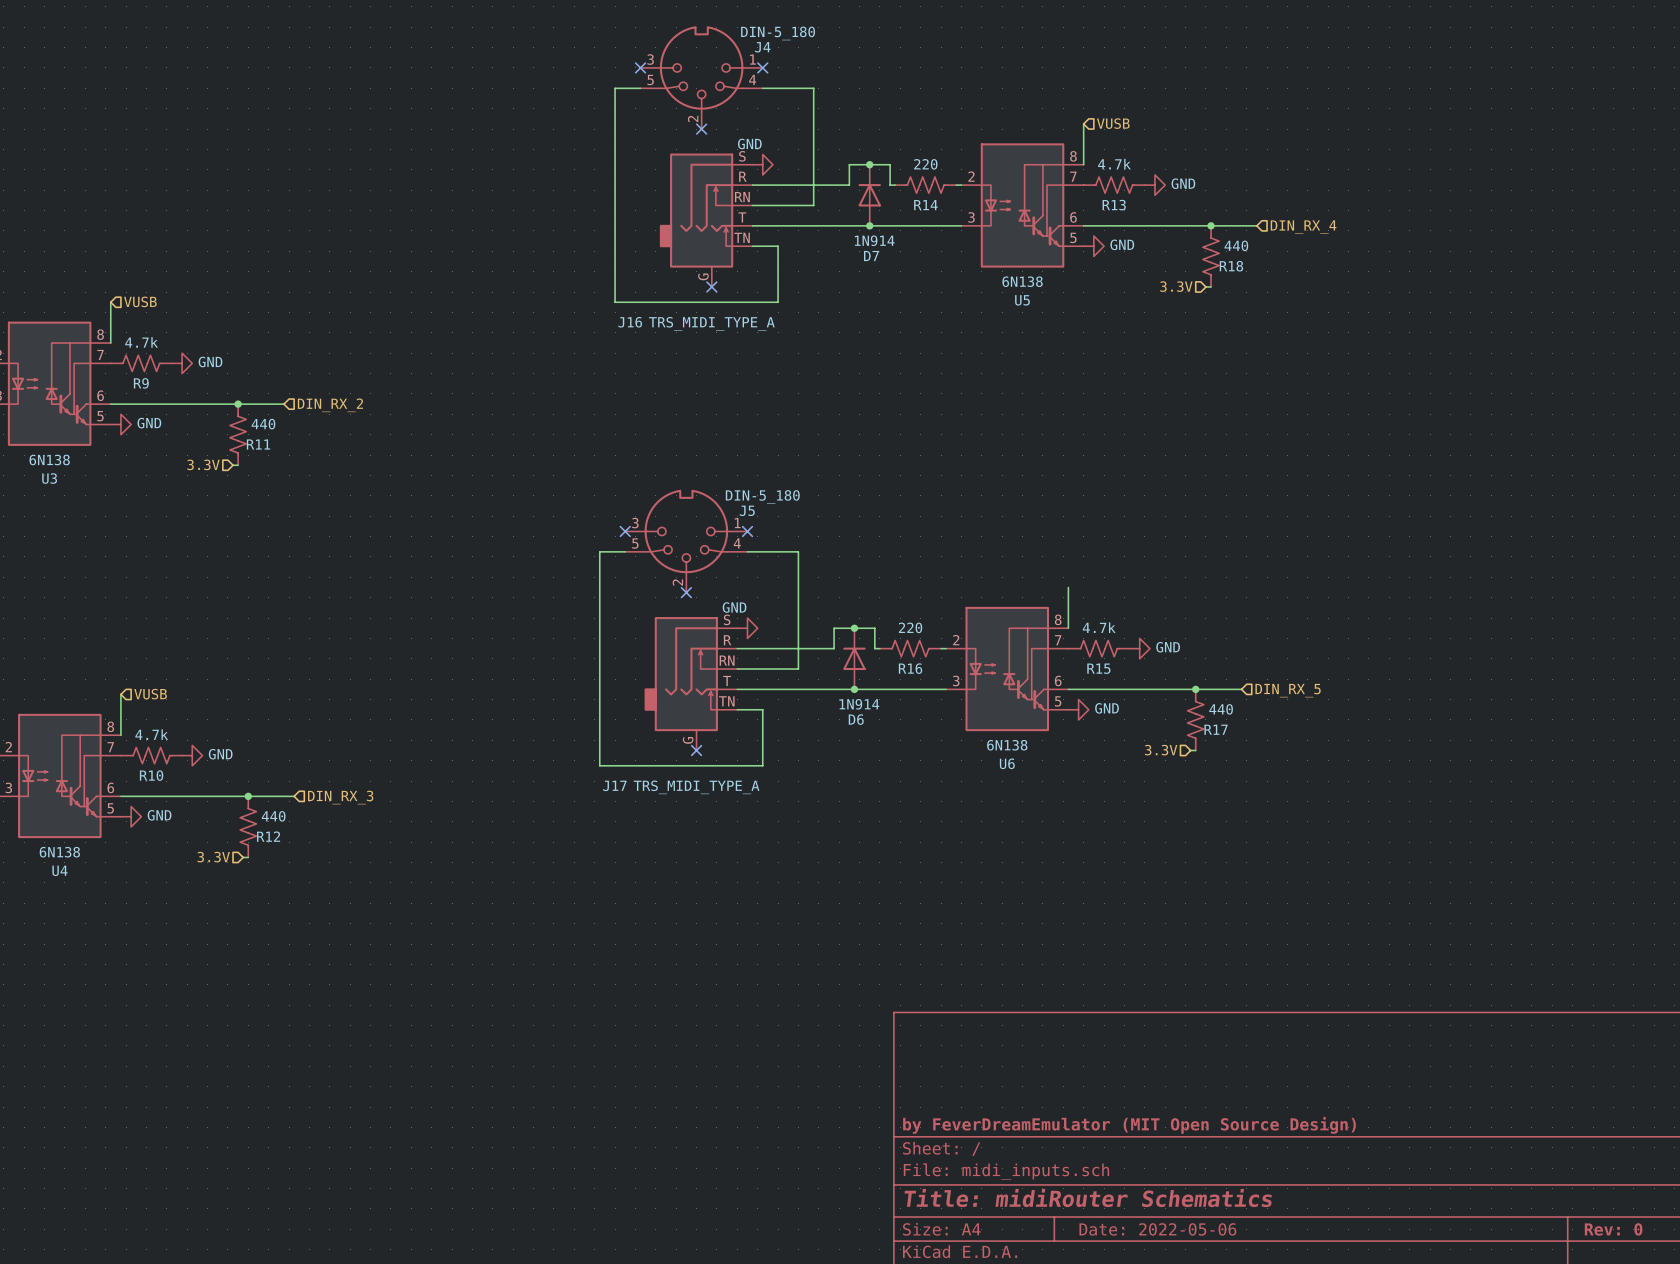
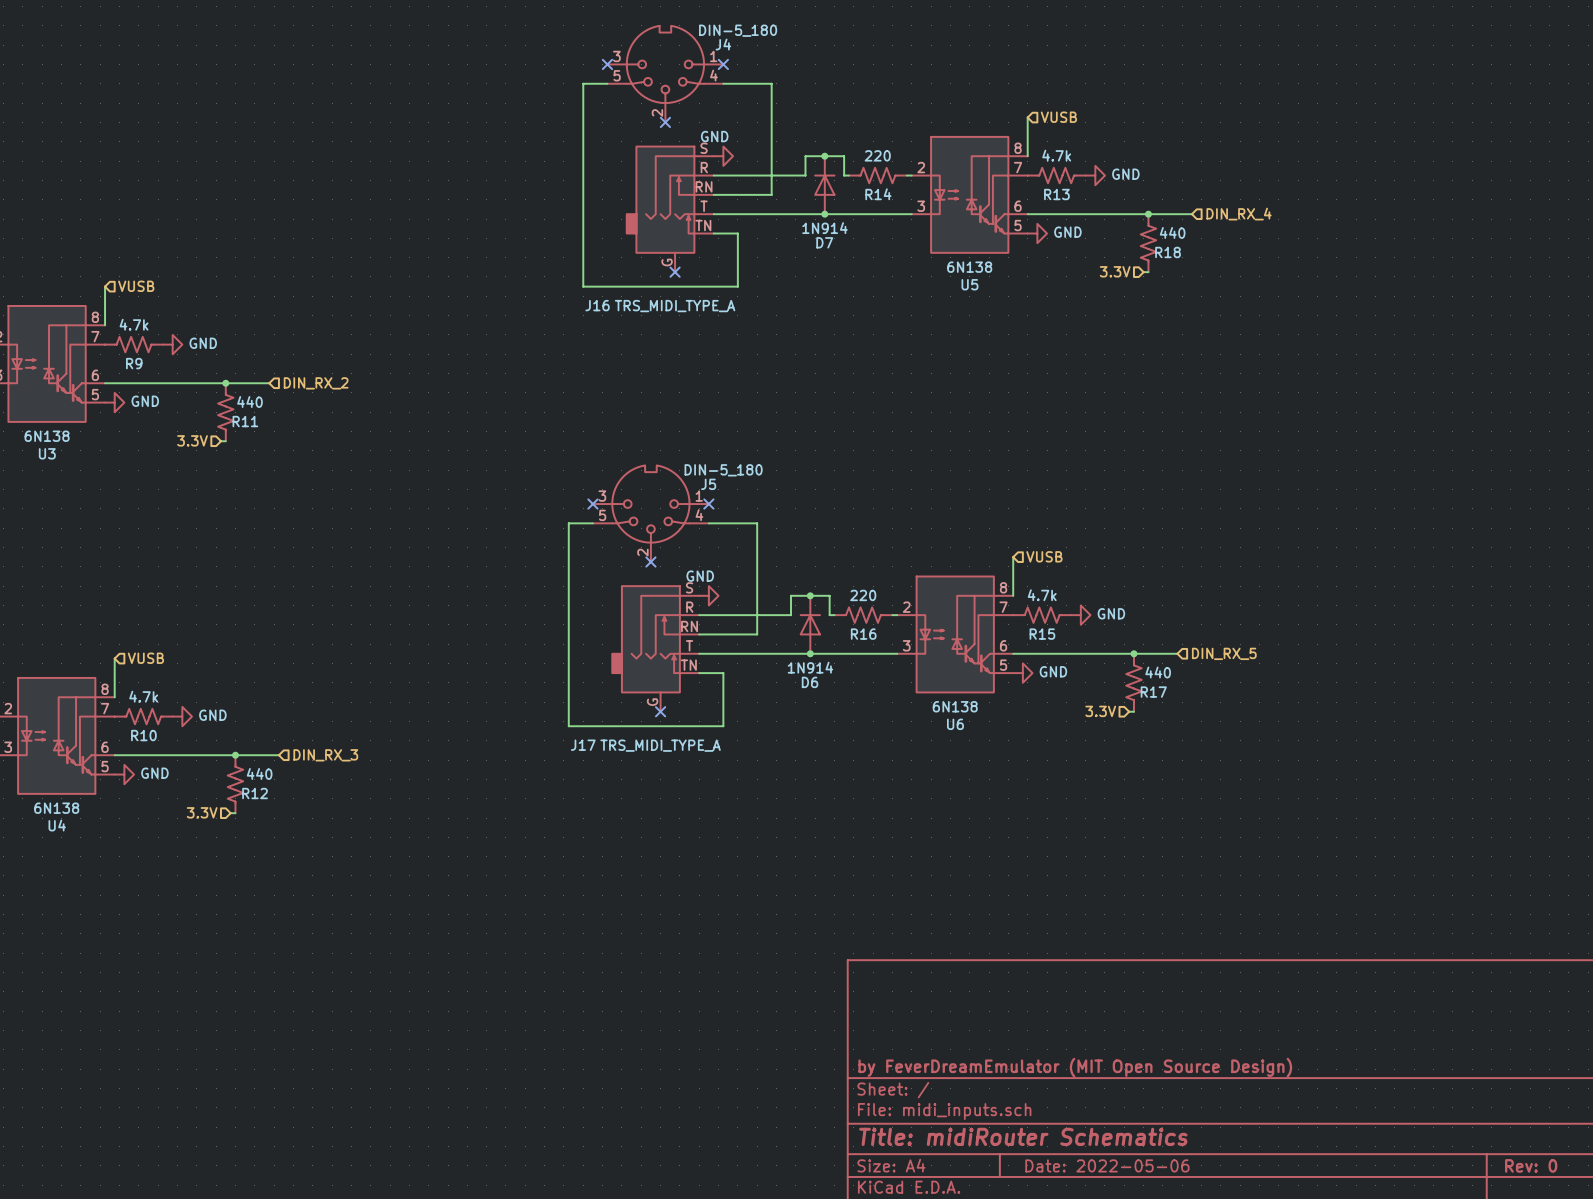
hierarchical label: none -> VUSB (1044, 556)

